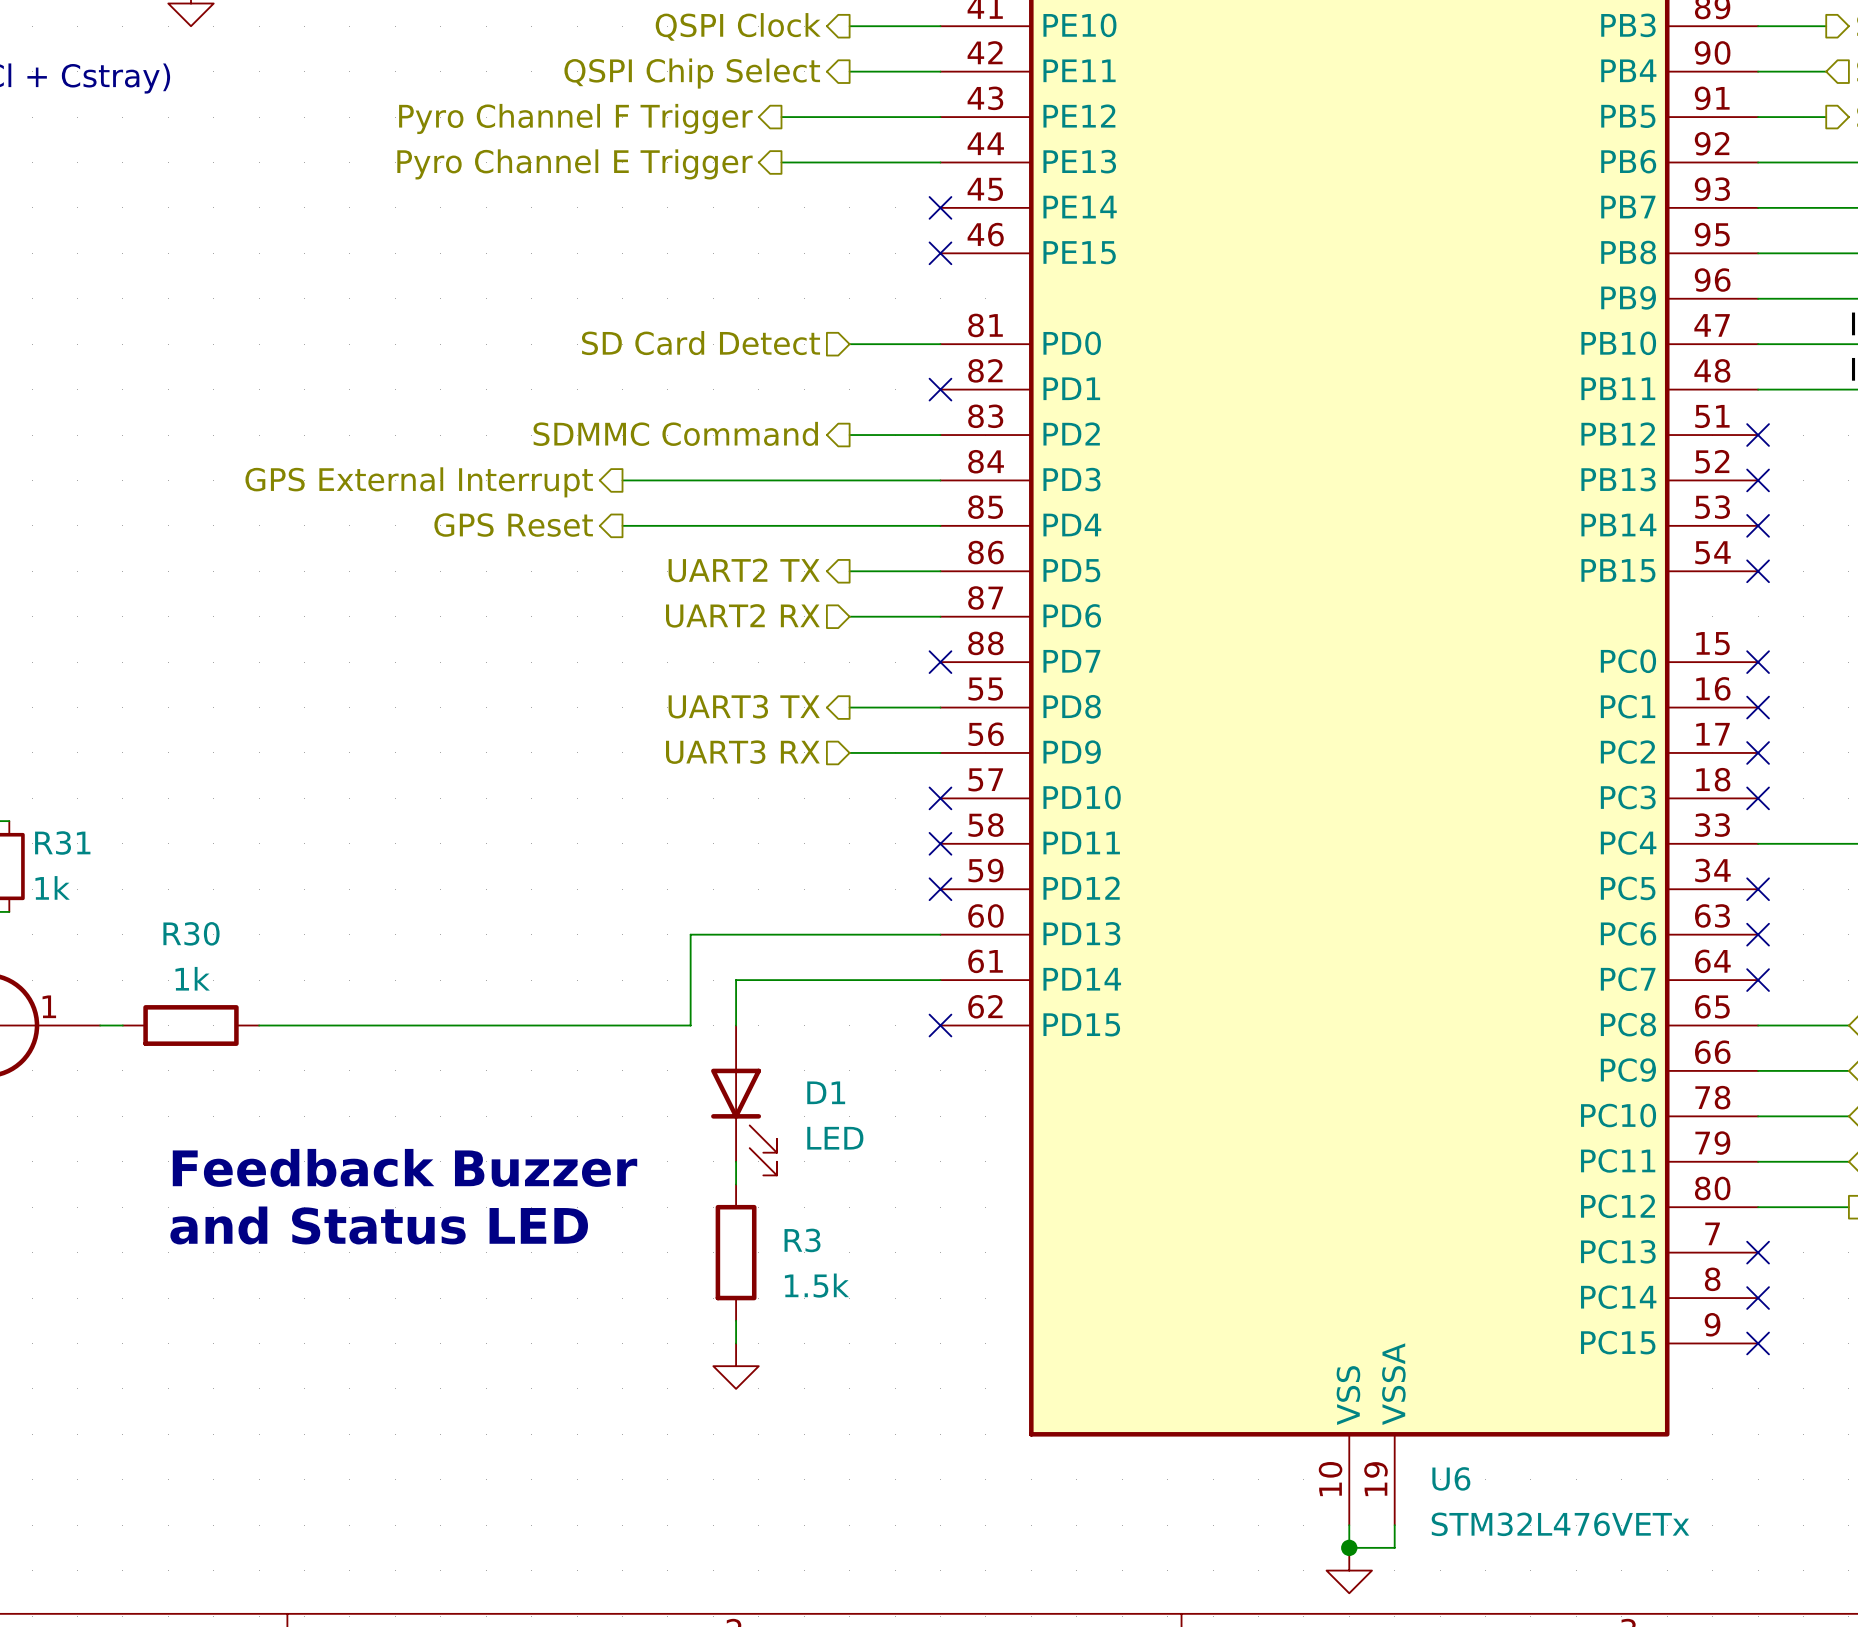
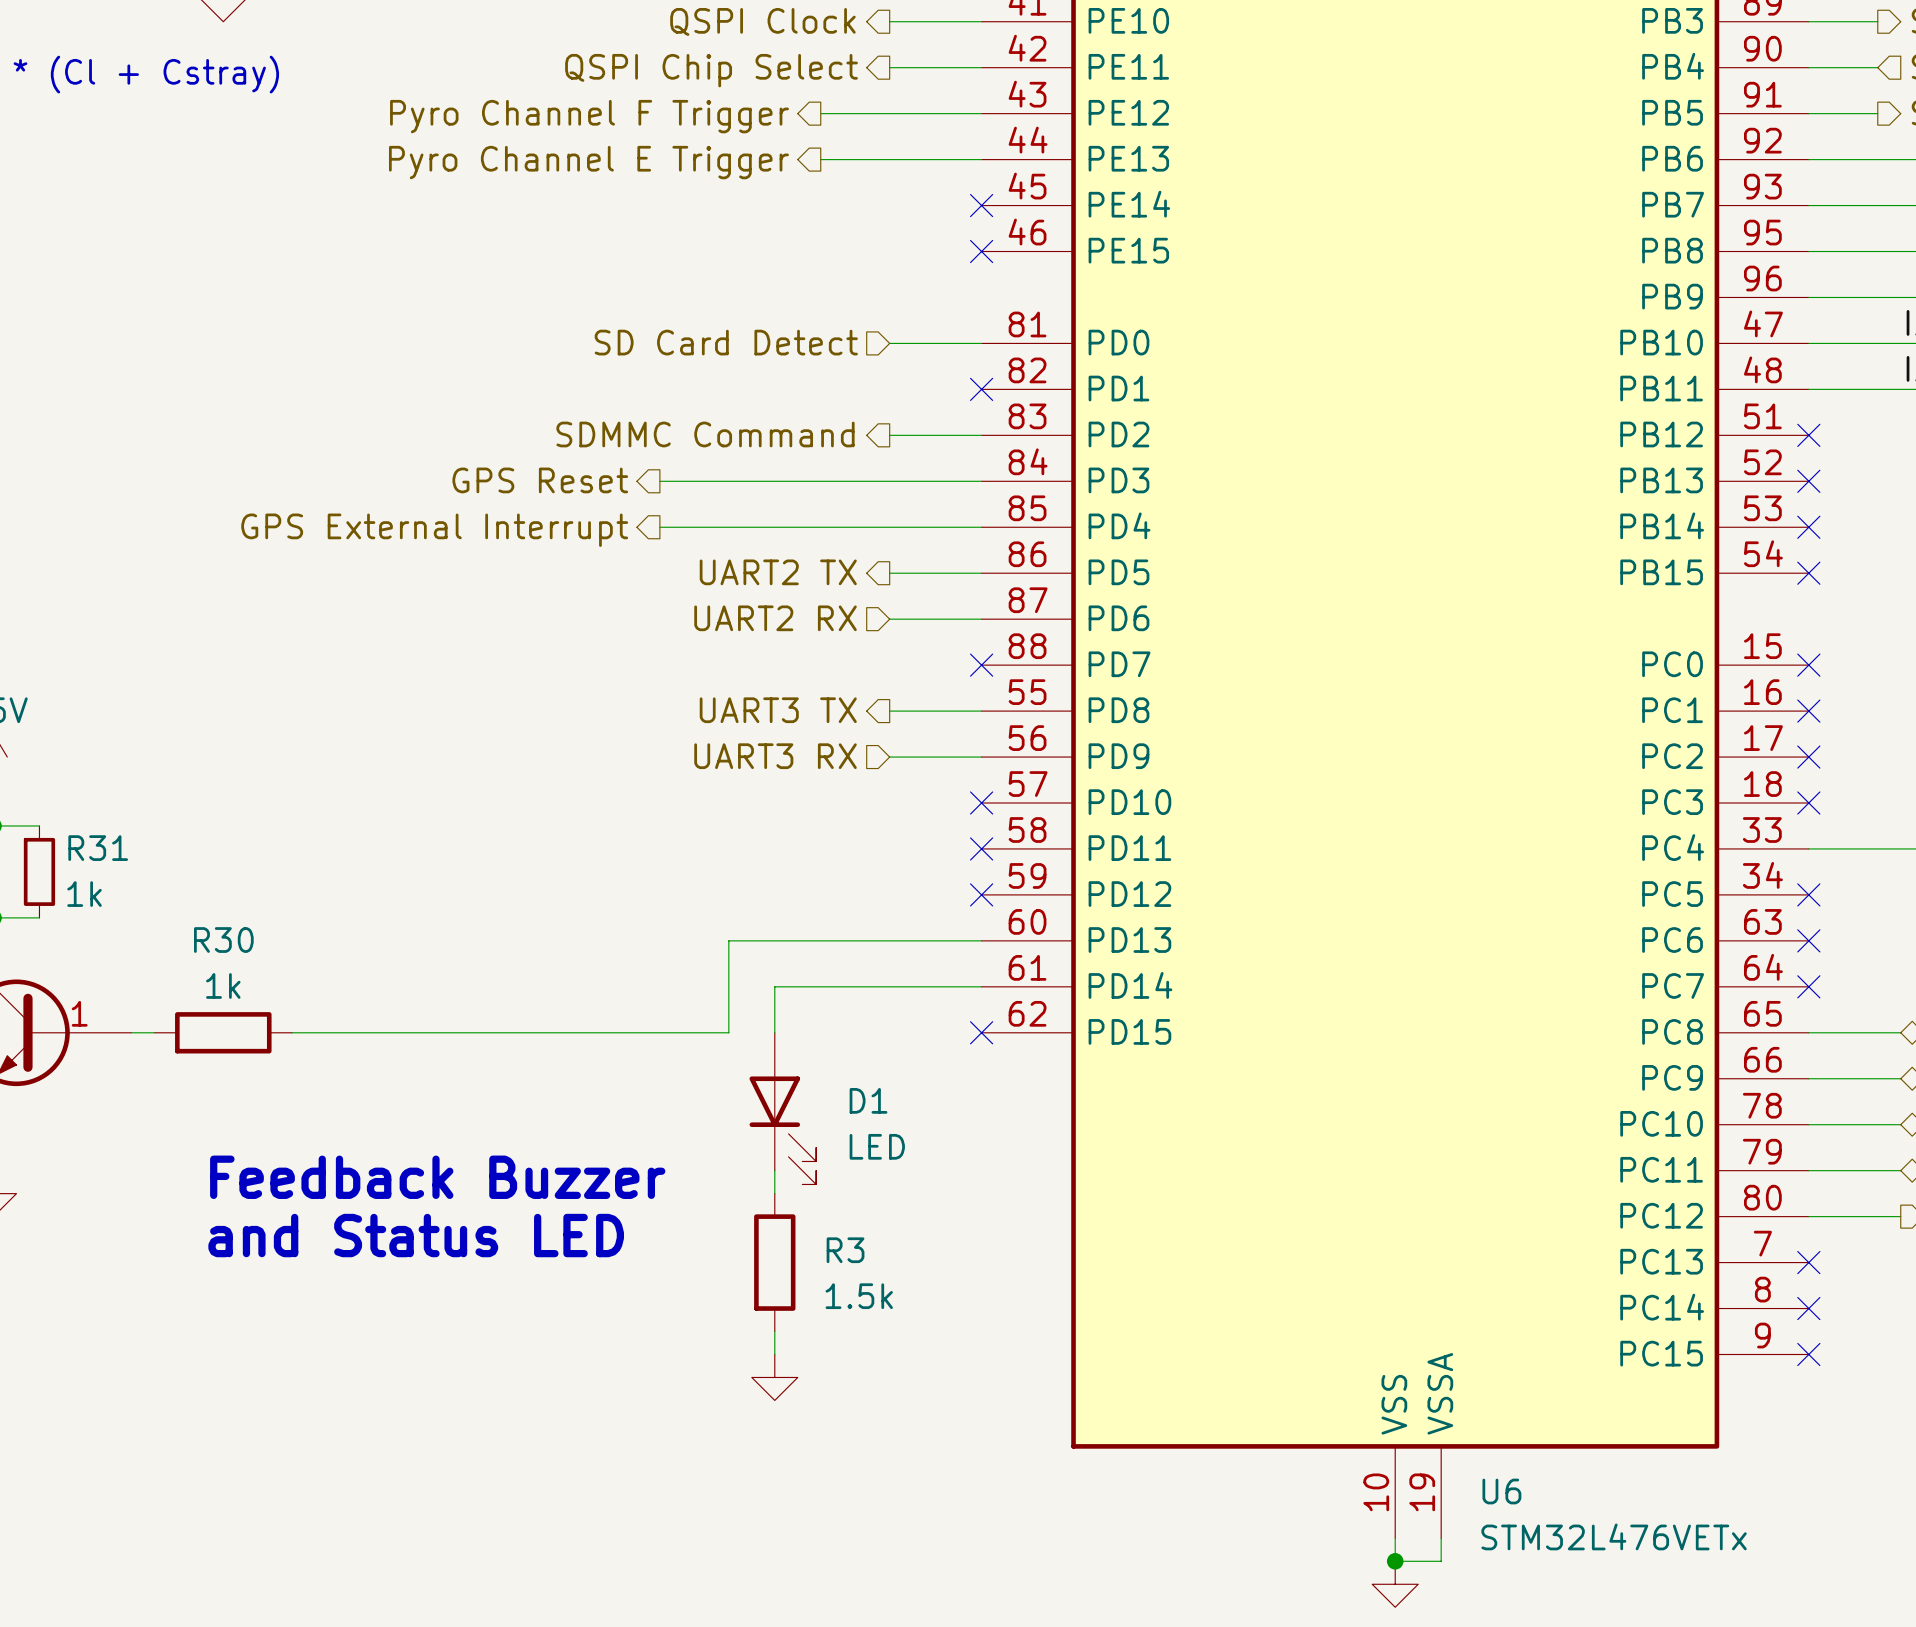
hierarchical label: GPS External Interrupt (419, 482) -> GPS Reset (540, 480)
hierarchical label: GPS Reset (513, 525) -> GPS External Interrupt (434, 530)

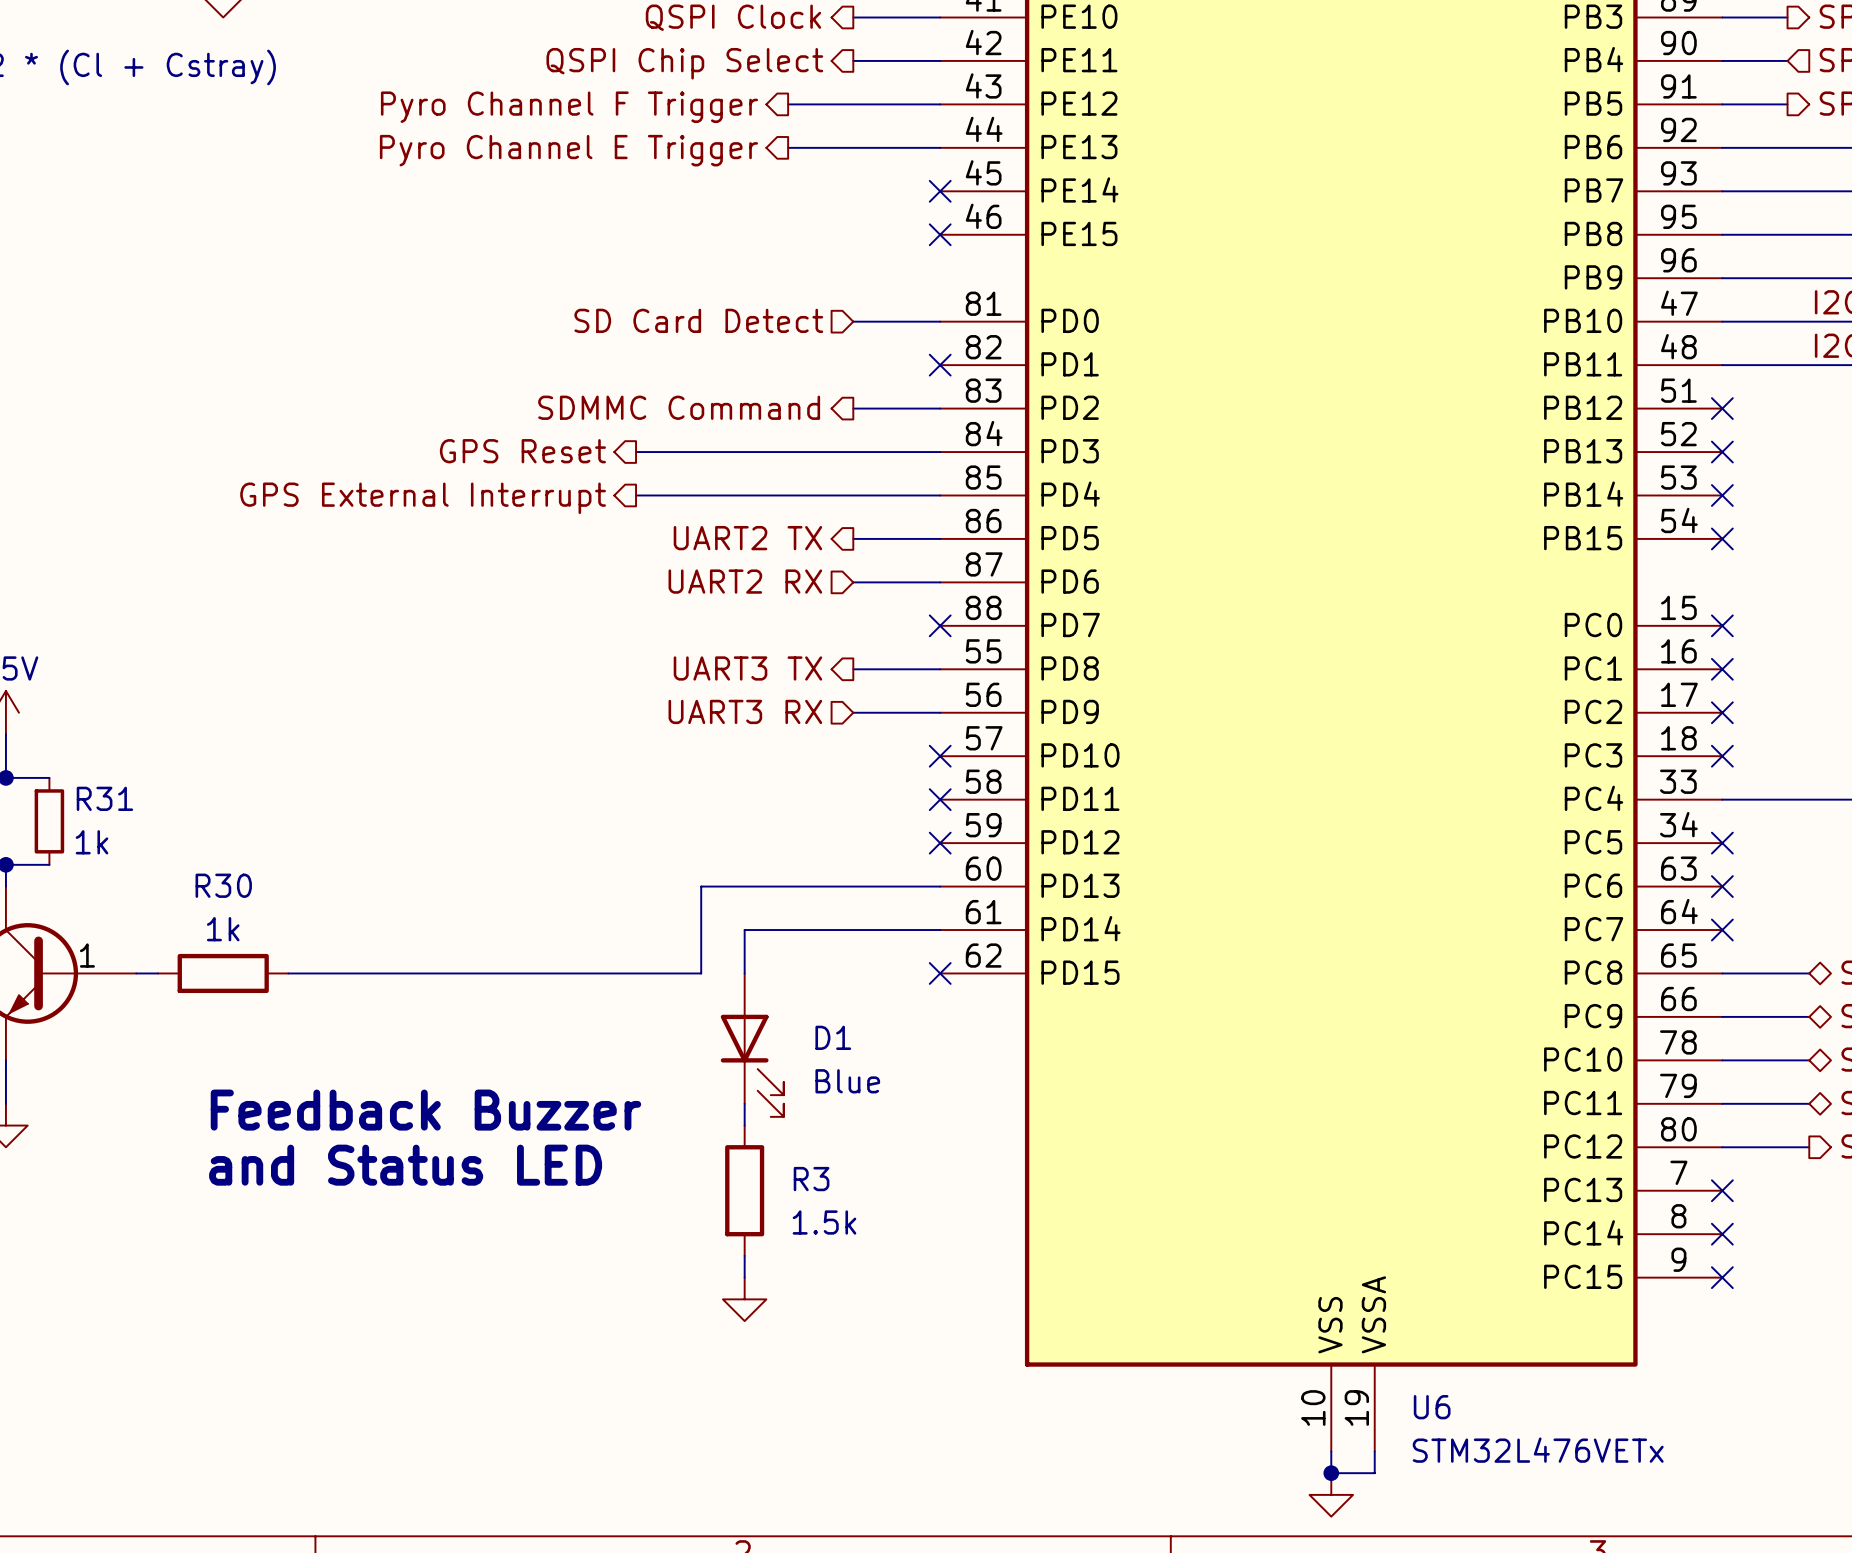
D1 value: LED (877, 1146) -> Blue (847, 1081)

